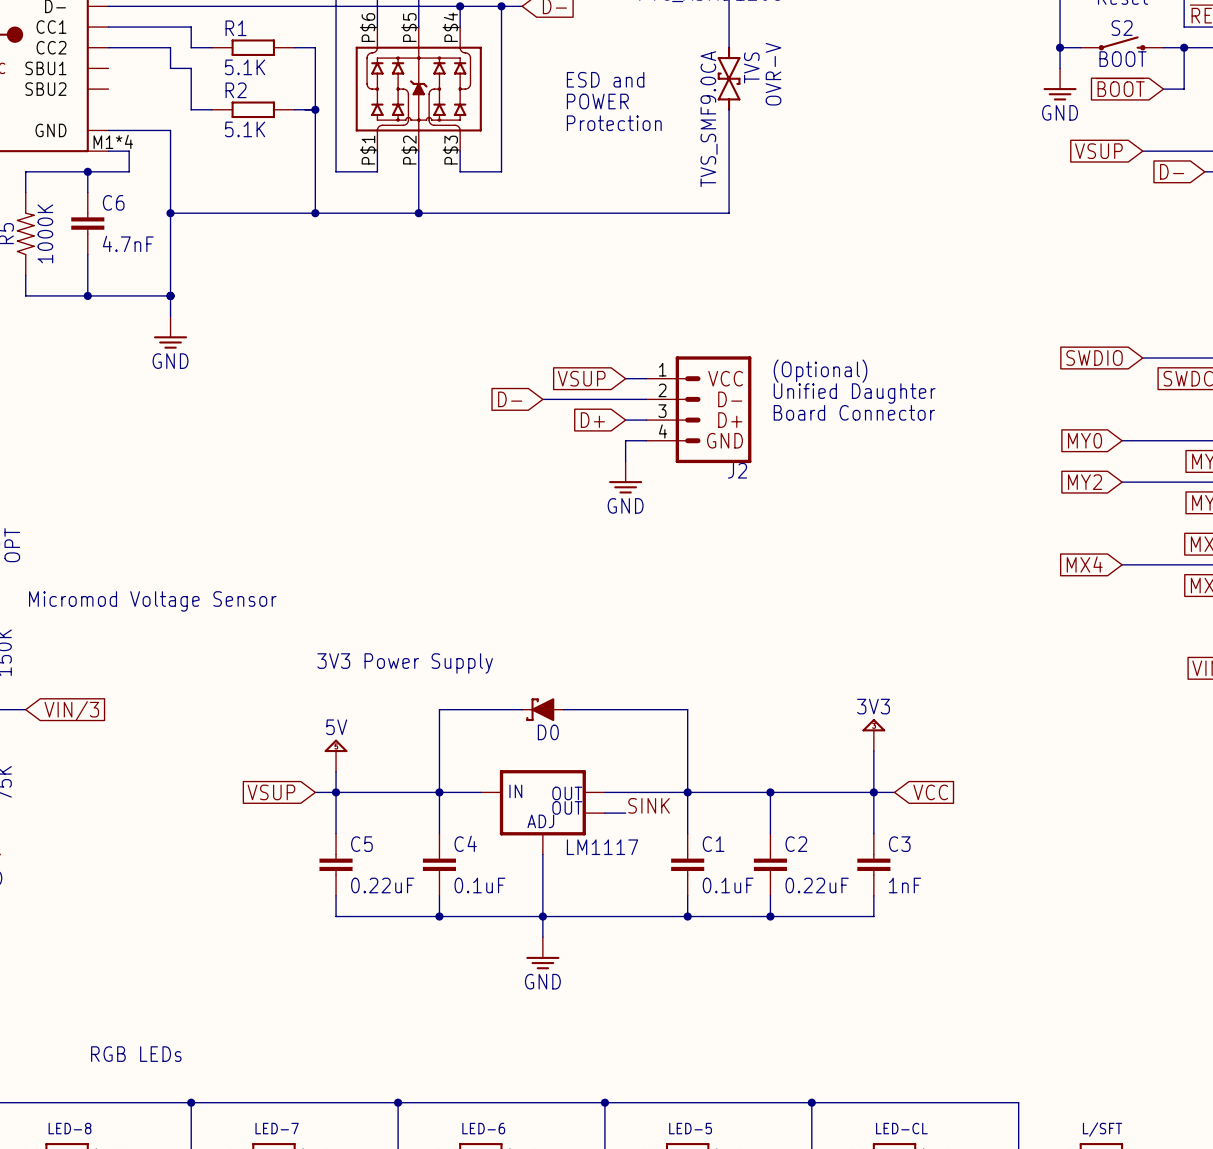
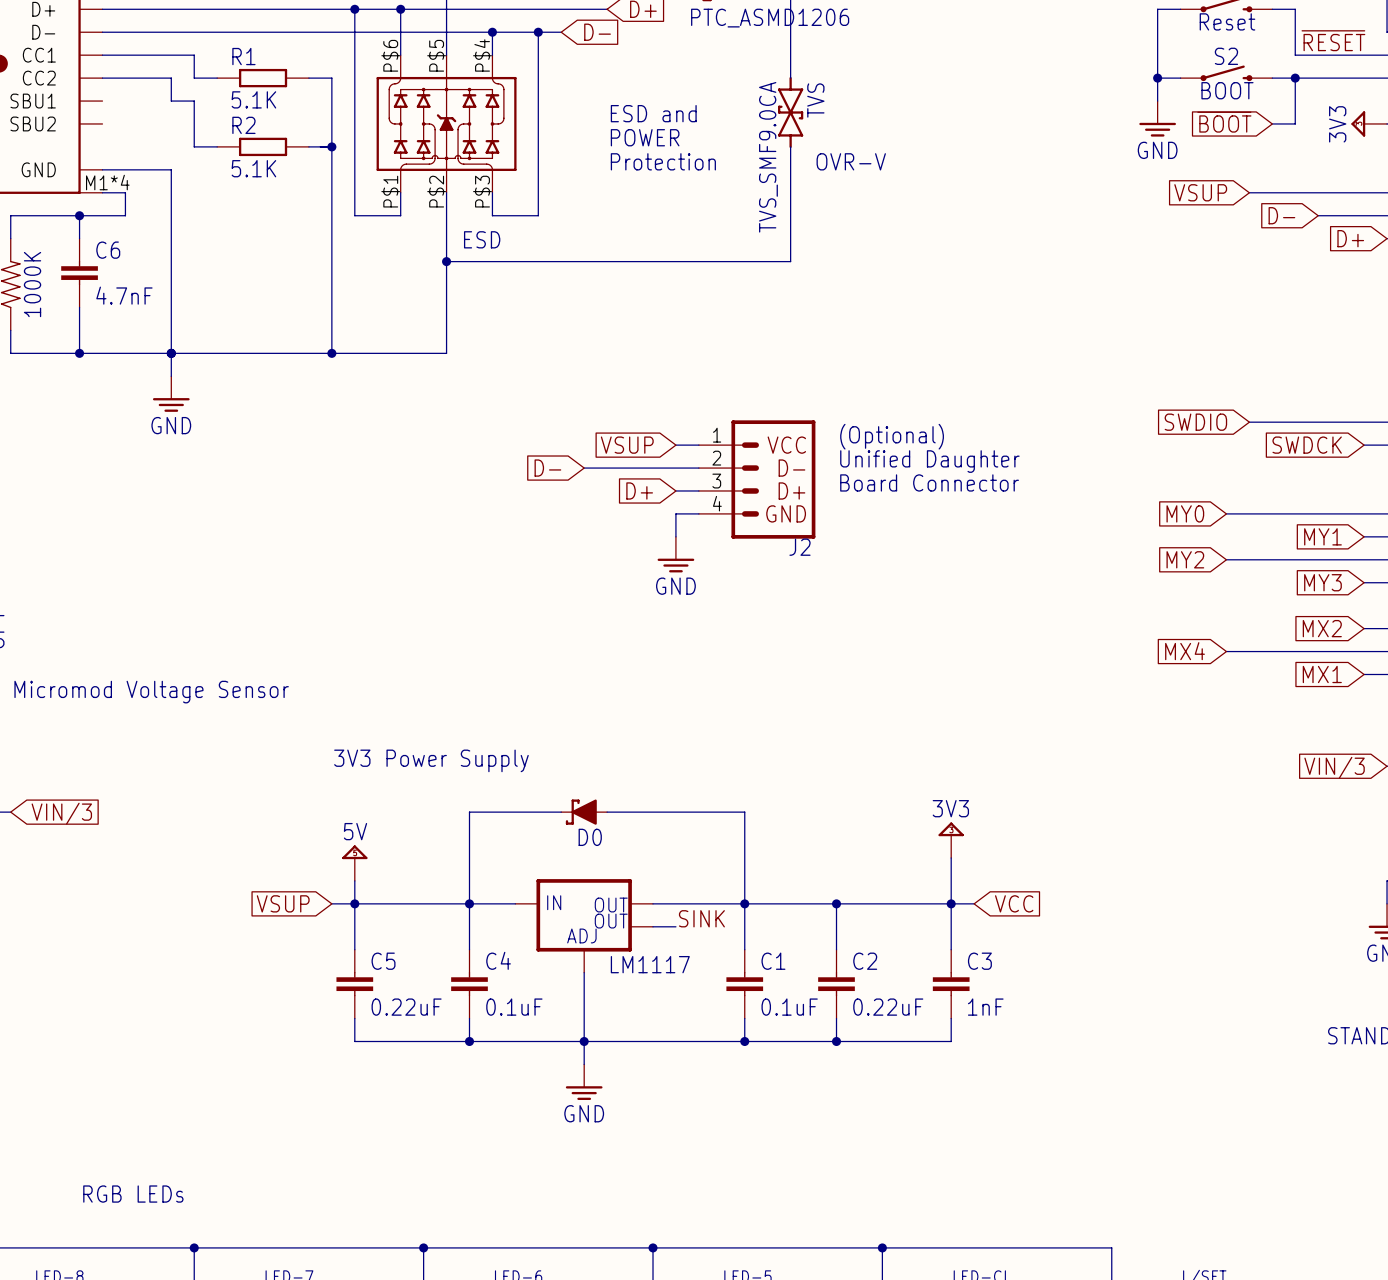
text rotation: 0° (773, 74) -> 90° clockwise (851, 161)
text: none -> ESD (482, 239)
wire: (170, 213) (418, 213) -> (171, 353) (446, 353) (446, 261)
junction: (170, 213) -> none
wire: none -> (331, 261) (331, 353)
junction: (315, 213) -> none
junction: none -> (331, 353)

